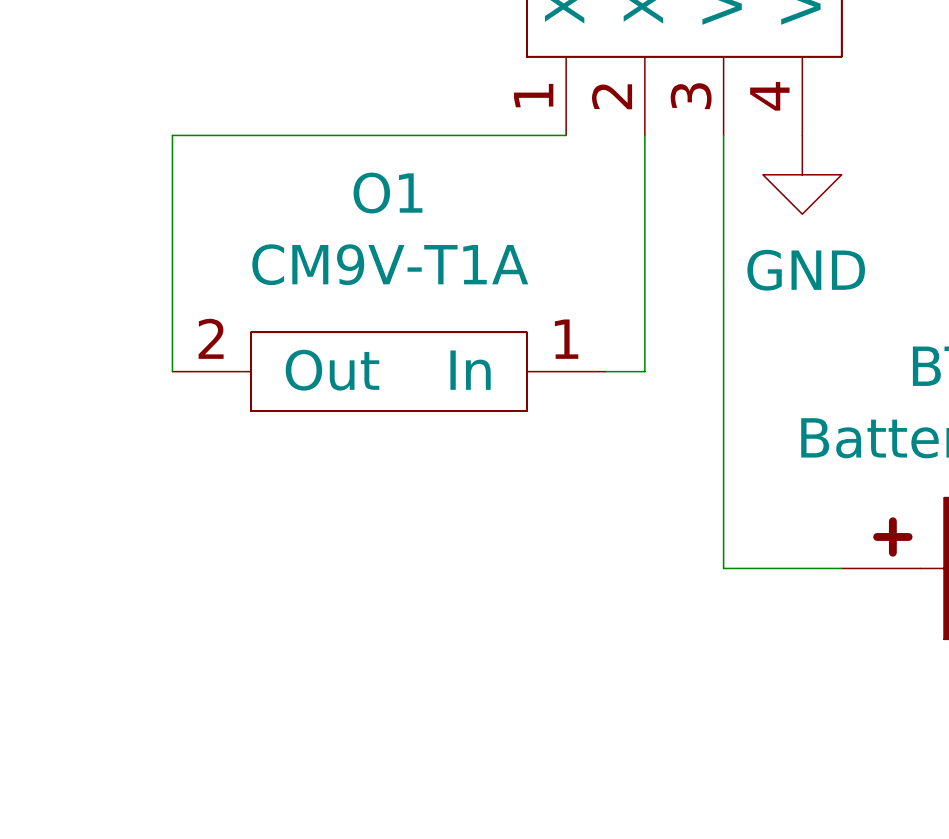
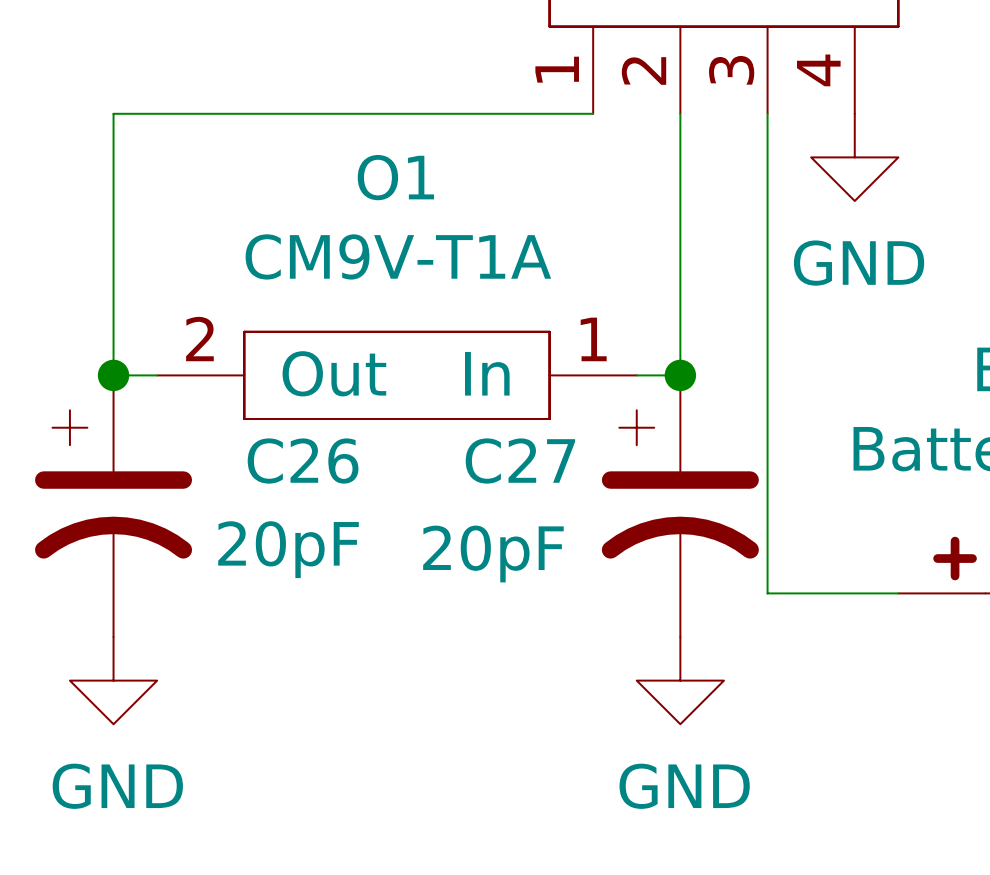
wire: (172, 135) (172, 371) -> (157, 113) (113, 113) (113, 375) (157, 375)
junction: none -> (113, 375)
junction: none -> (680, 375)
C26: none -> 20pF (113, 506)
C27: none -> 20pF (680, 506)
power symbol: none -> GND (113, 680)
power symbol: none -> GND (680, 680)

